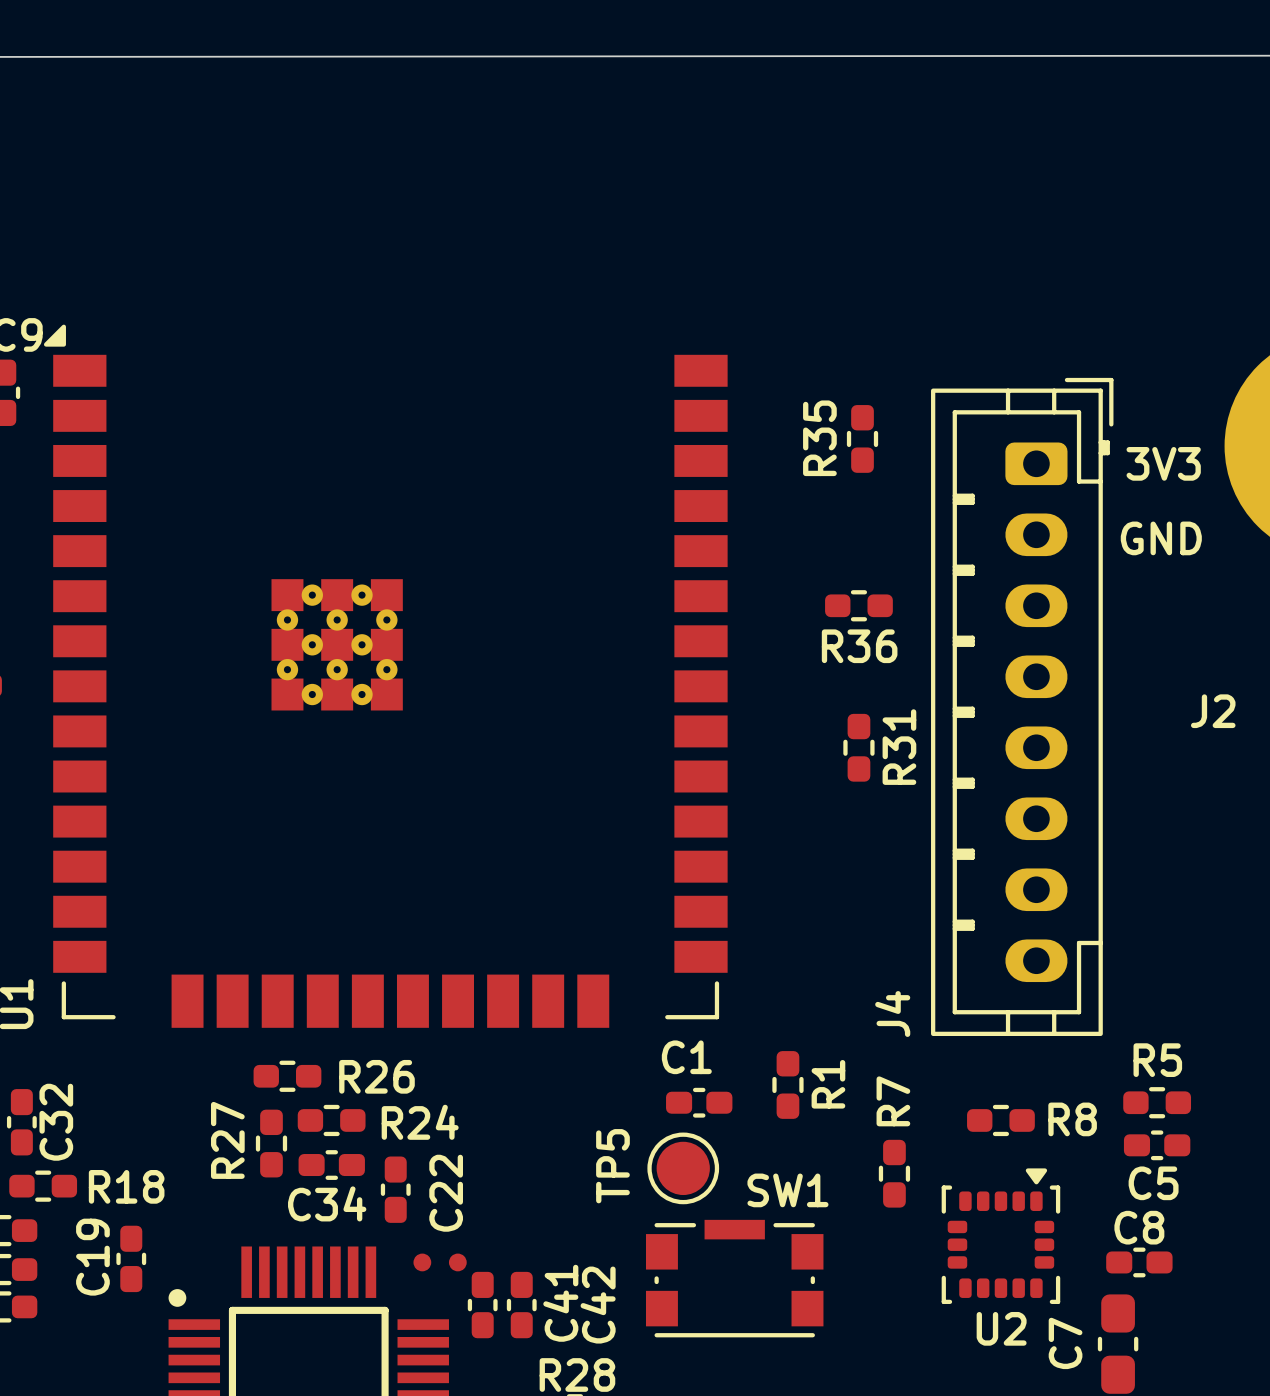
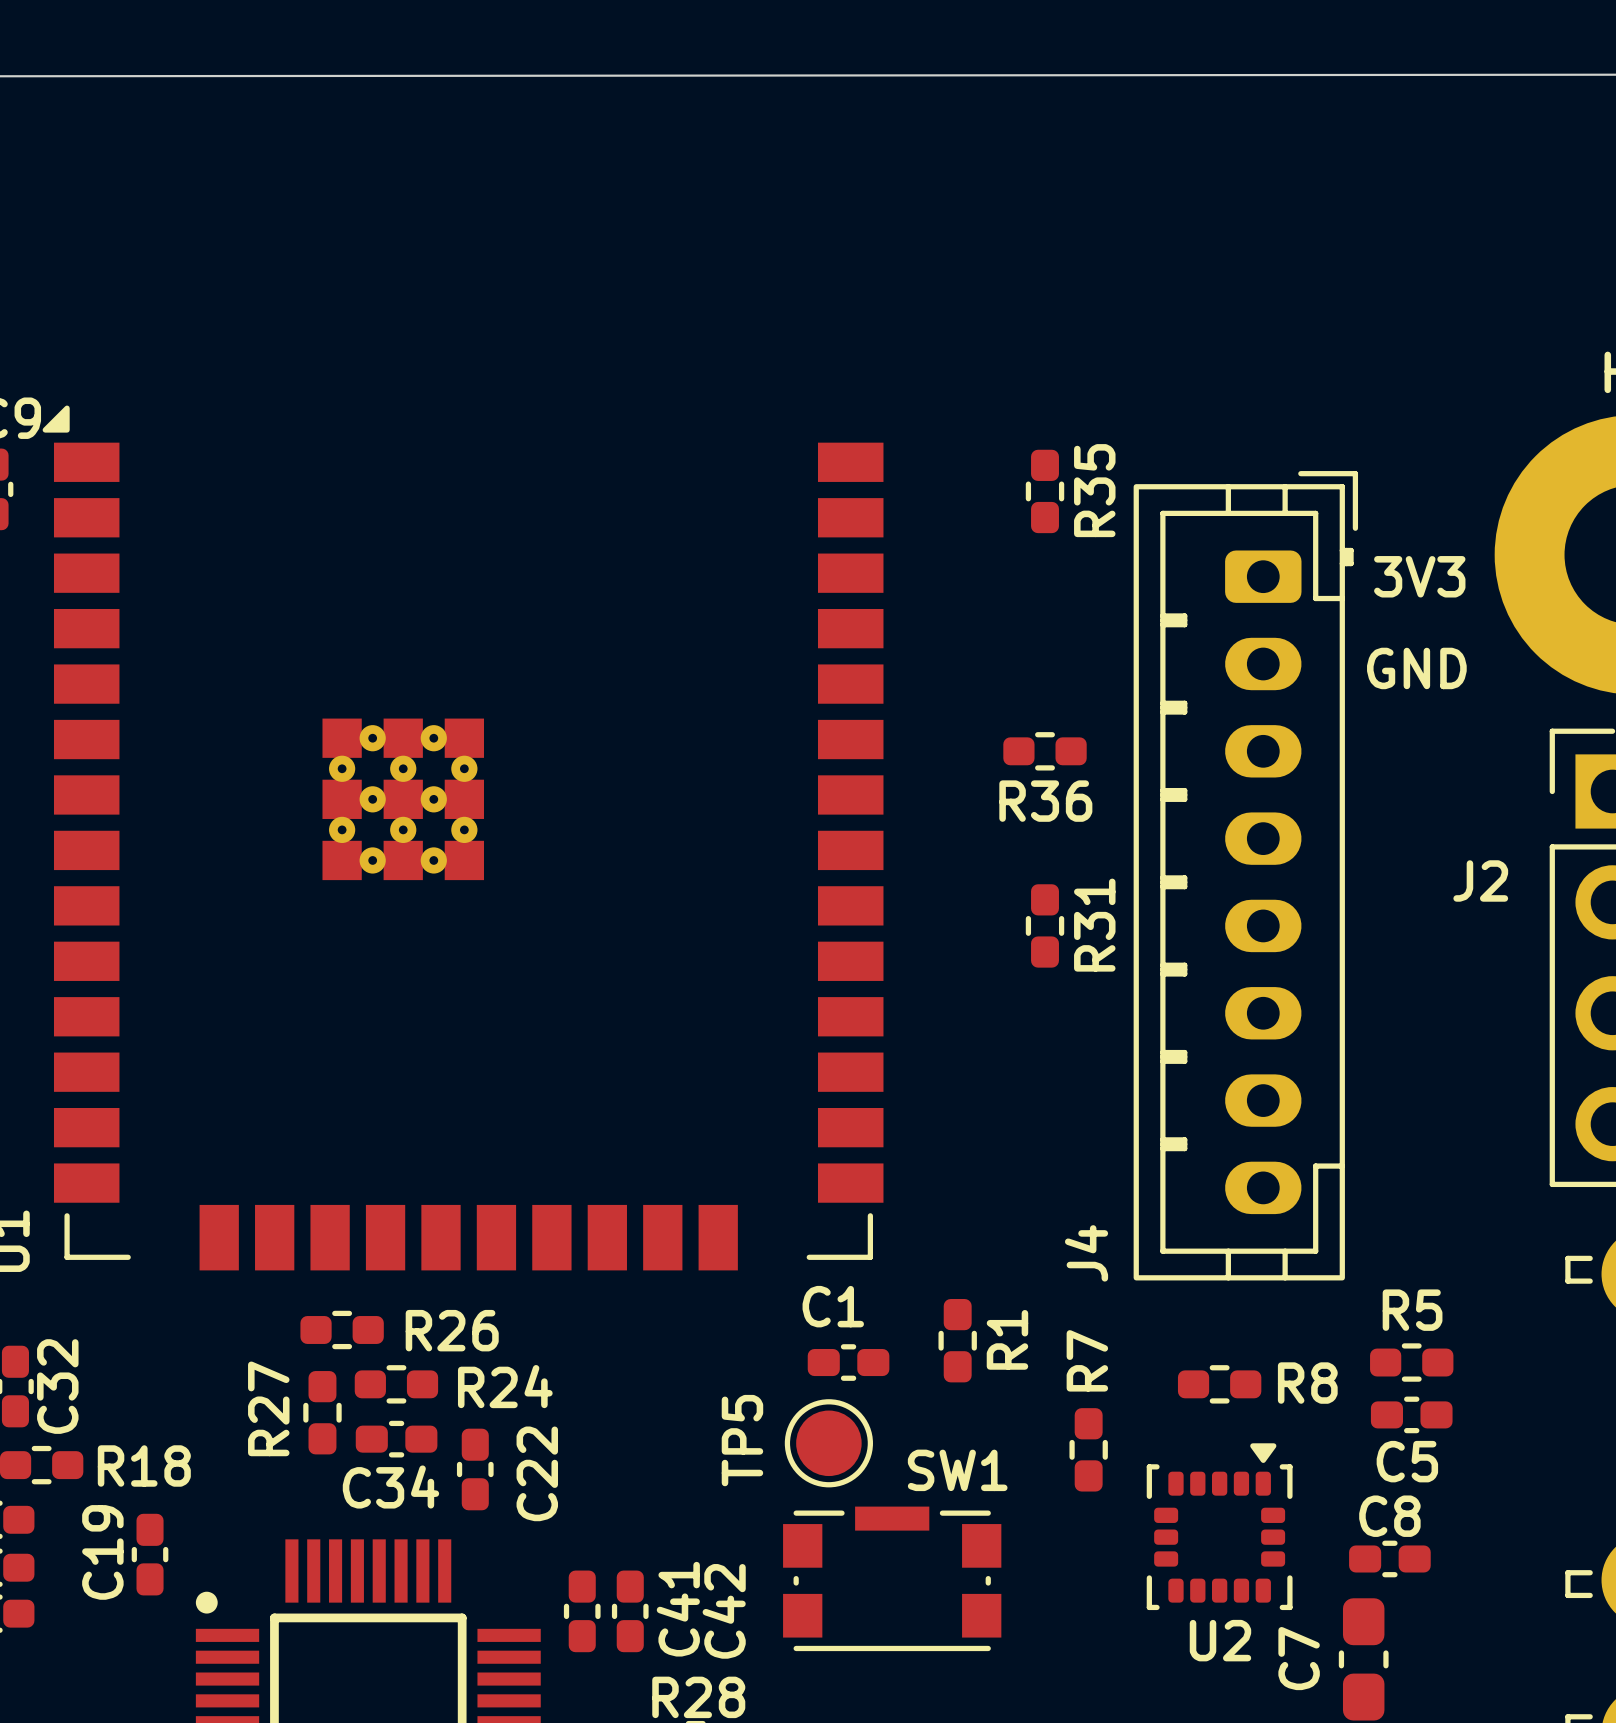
R35 name position: R35 (819, 438) -> R35 (1094, 490)
R35 position: (862, 438) -> (1045, 491)
part: (440, 1262) -> none

